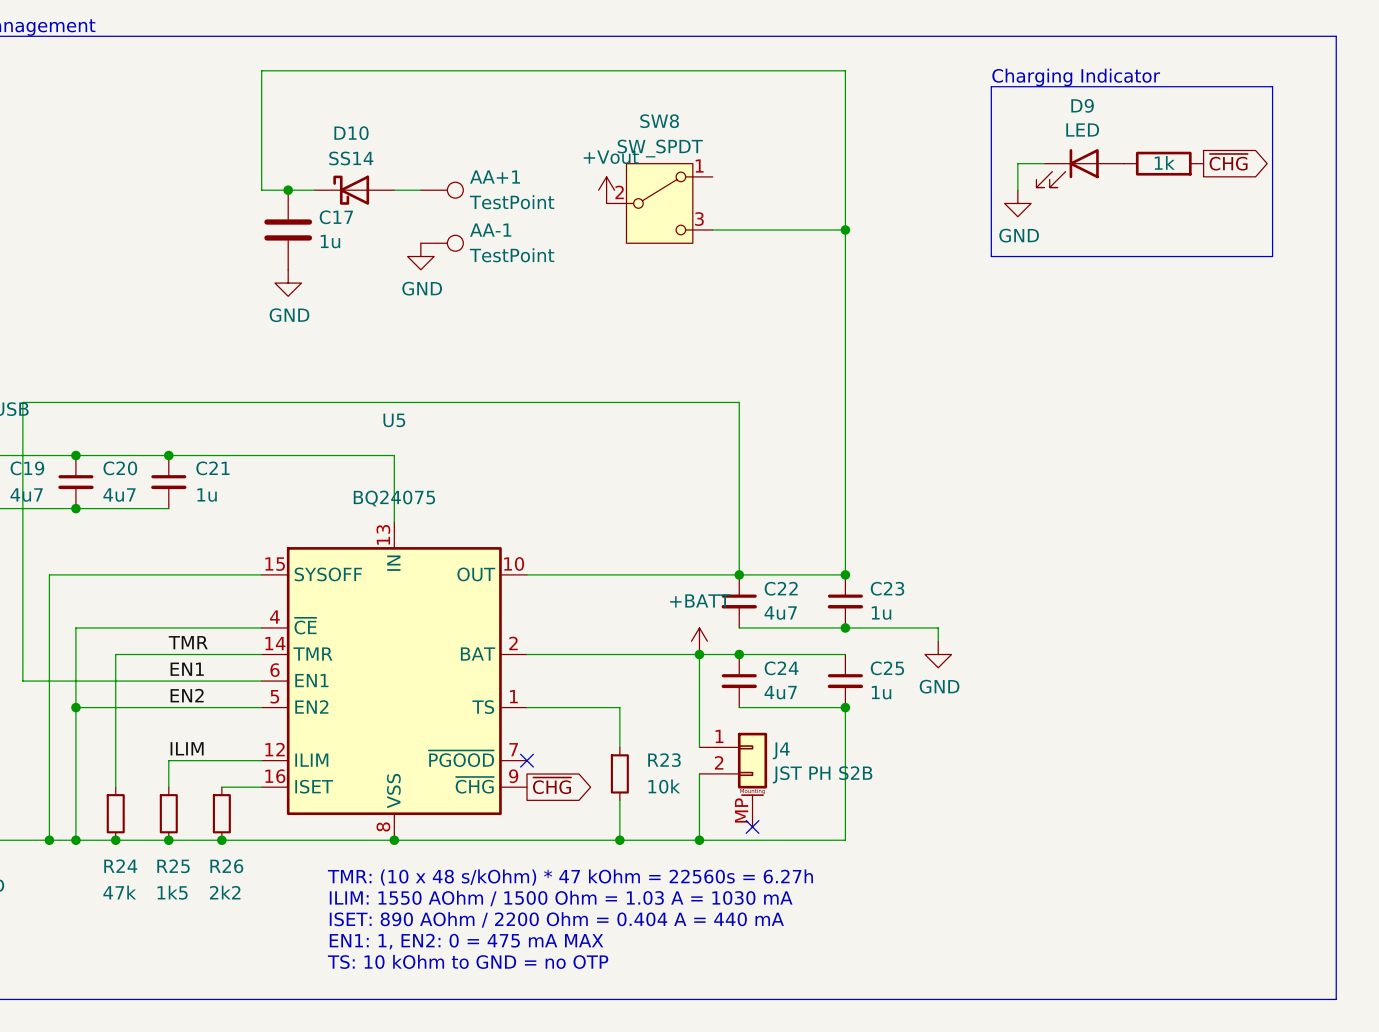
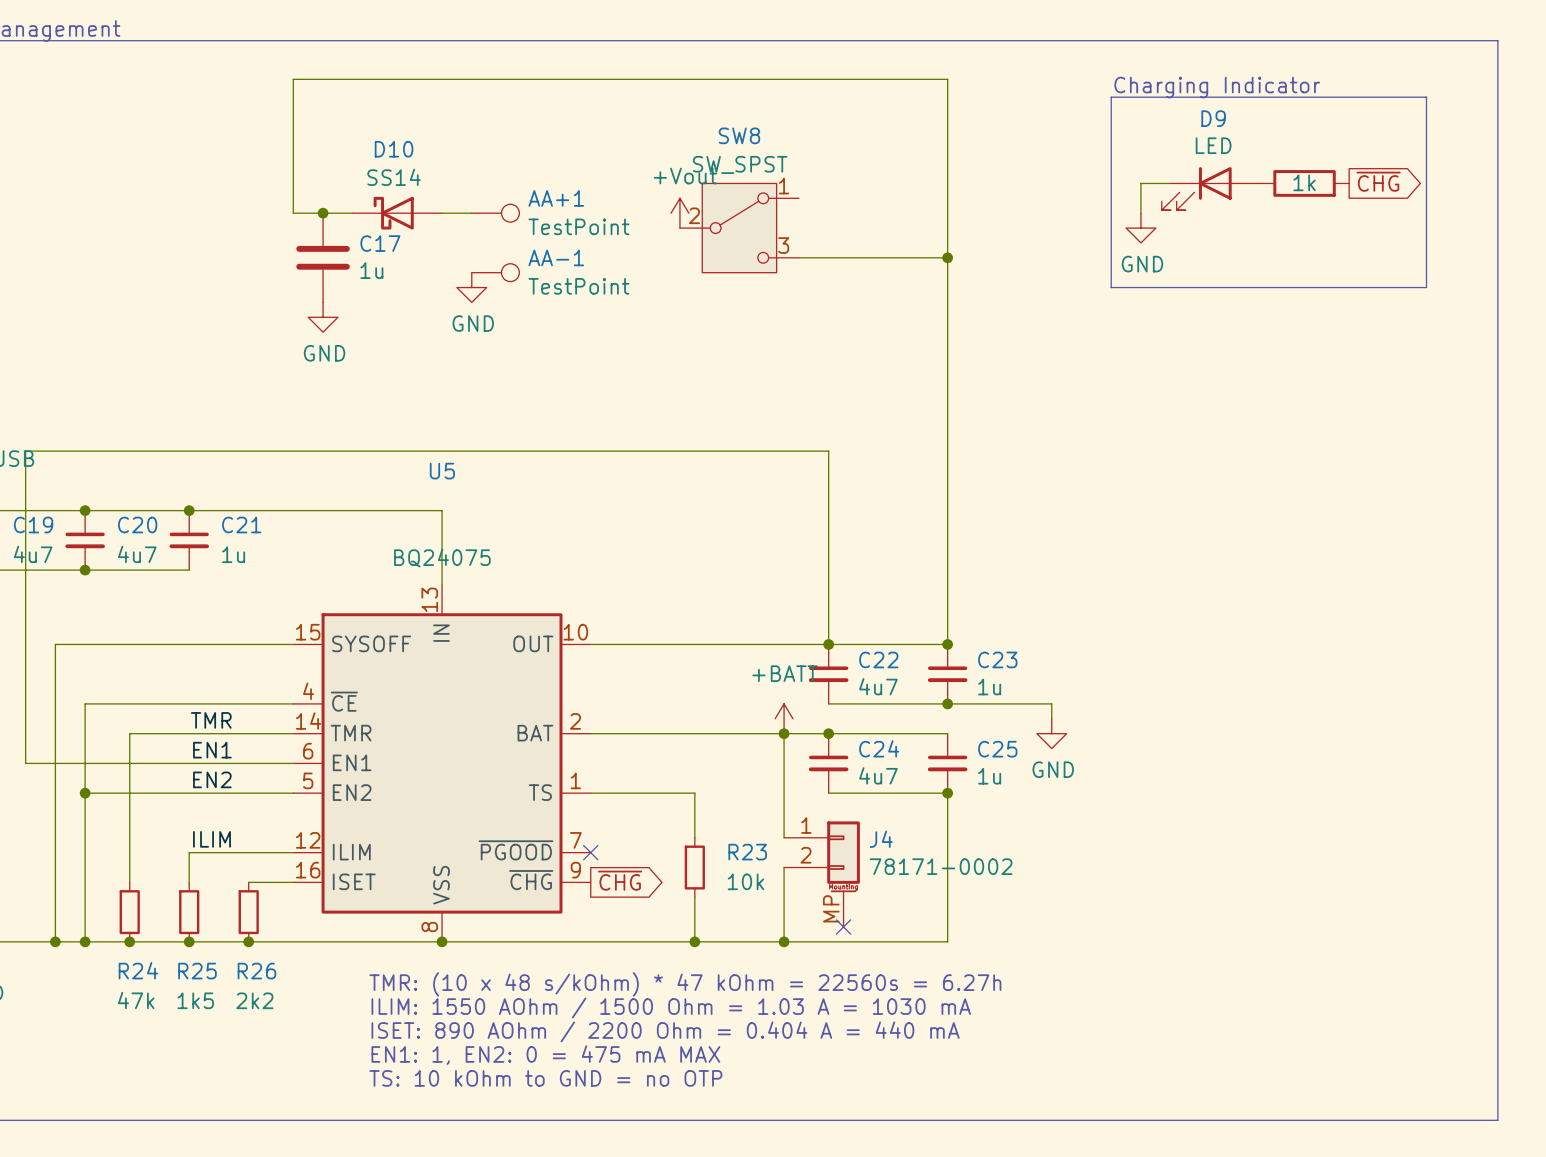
SW8 value: SW_SPDT (660, 148) -> SW_SPST (740, 164)
J4 value: JST PH S2B (822, 774) -> 78171-0002 (941, 866)

